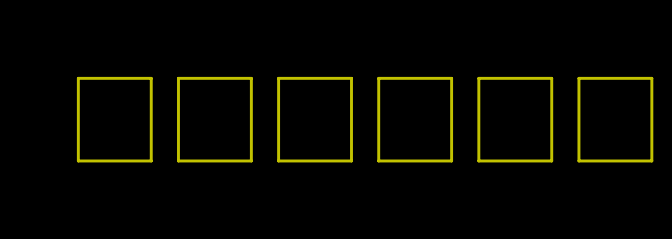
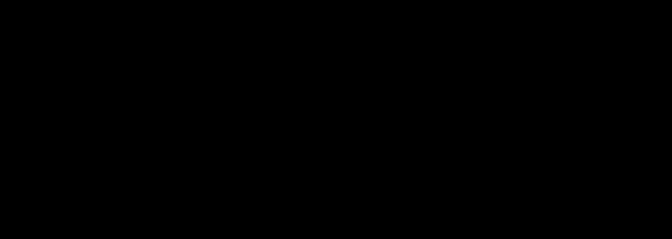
part: (114, 119) -> none
part: (214, 119) -> none
part: (315, 119) -> none
part: (415, 119) -> none
part: (515, 119) -> none
part: (615, 119) -> none

